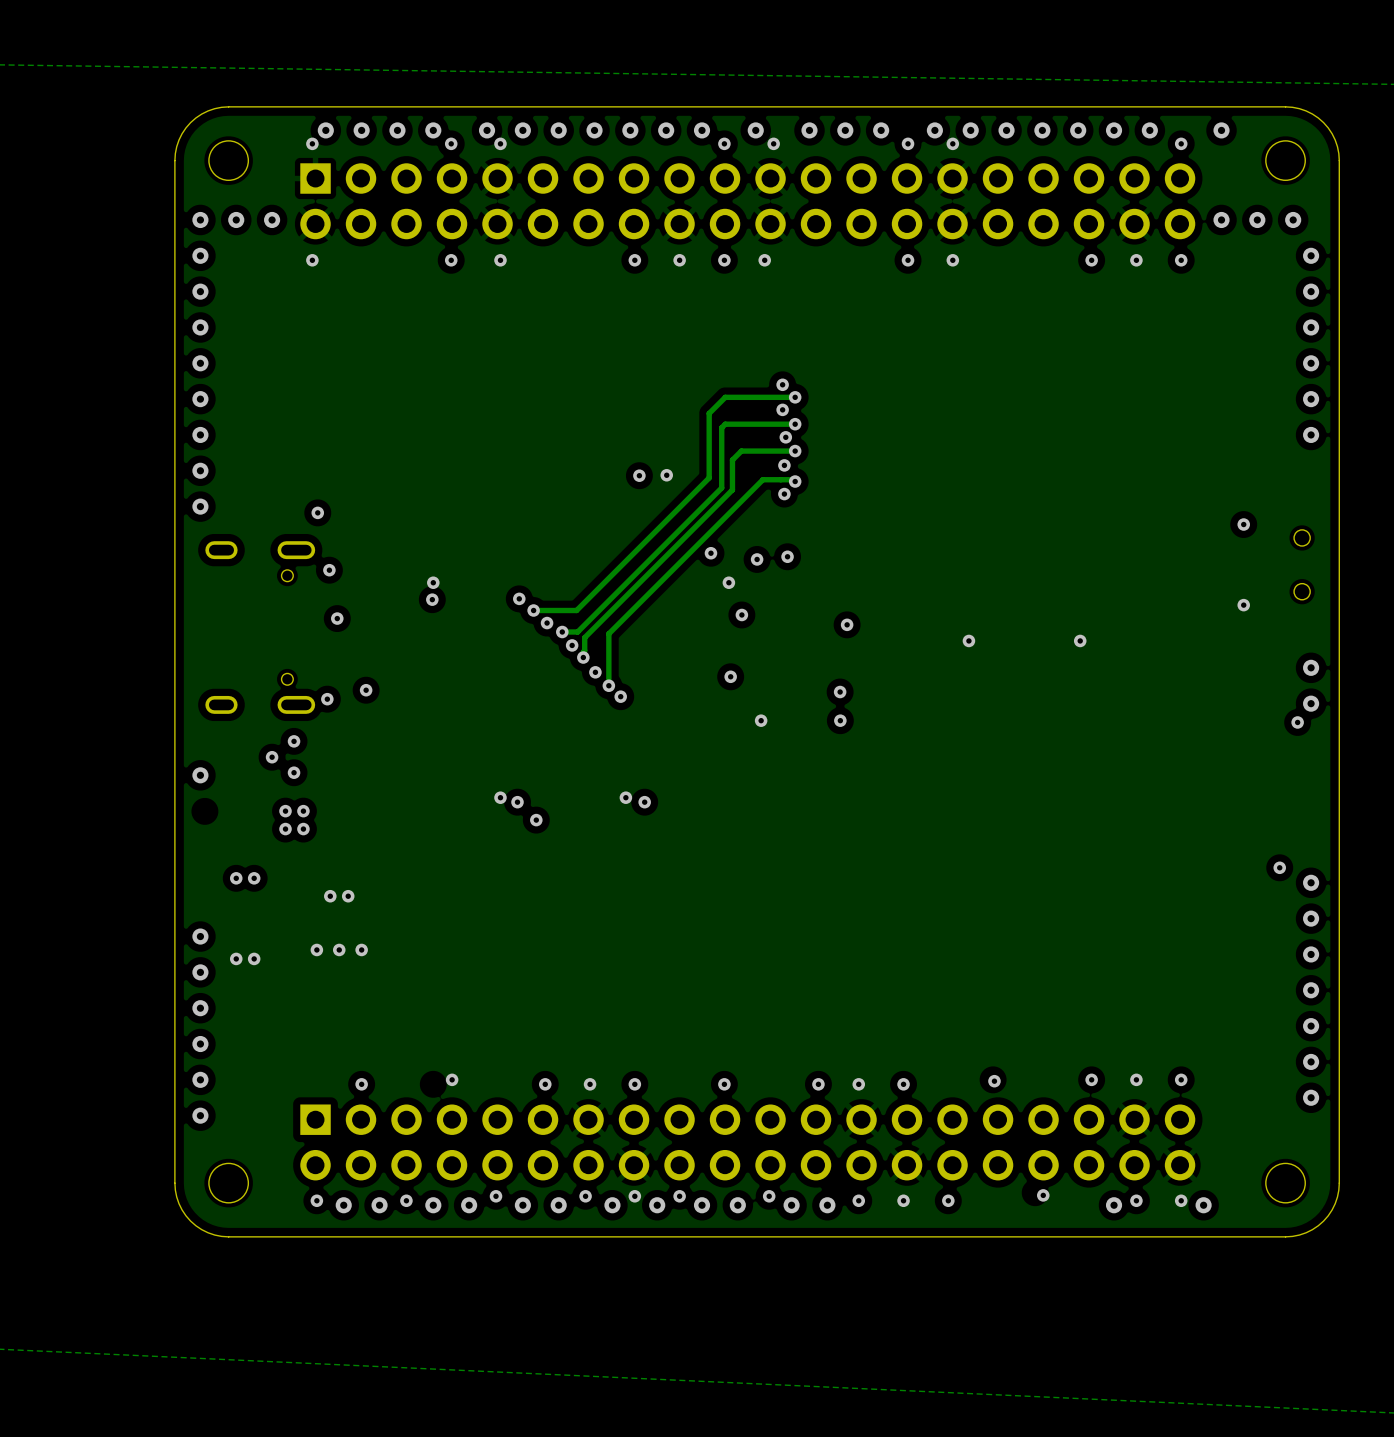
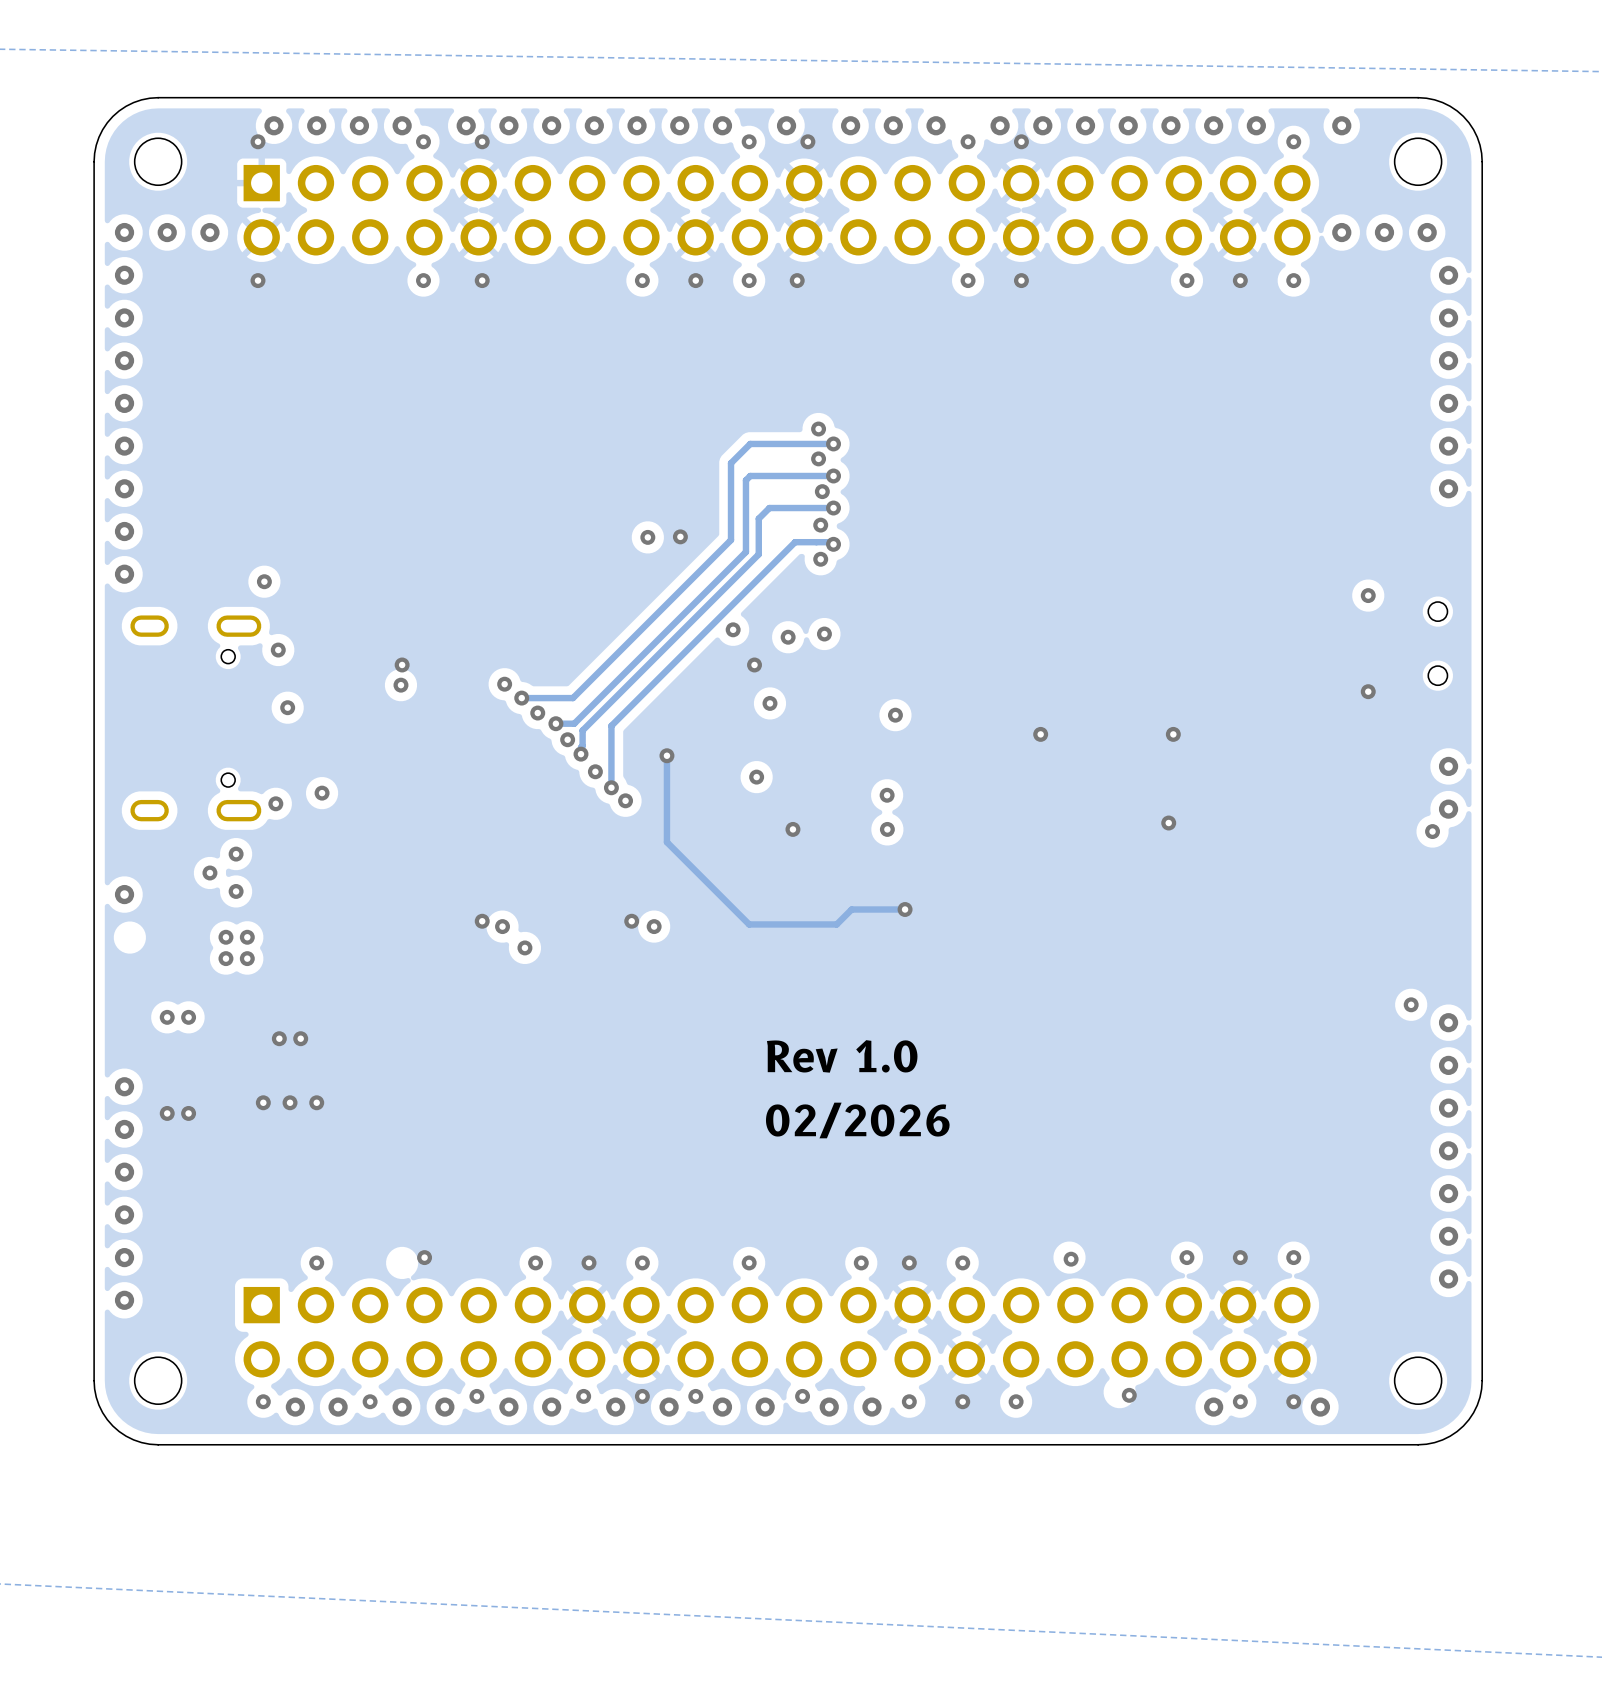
track: none -> (666, 755) (666, 842) (749, 924) (836, 924) (851, 909) (905, 909)
via: none -> (666, 755)
via: none -> (1168, 823)
via: none -> (905, 909)
text: none -> Rev 1.0 (842, 1056)
text: none -> 02/2026 (857, 1120)

